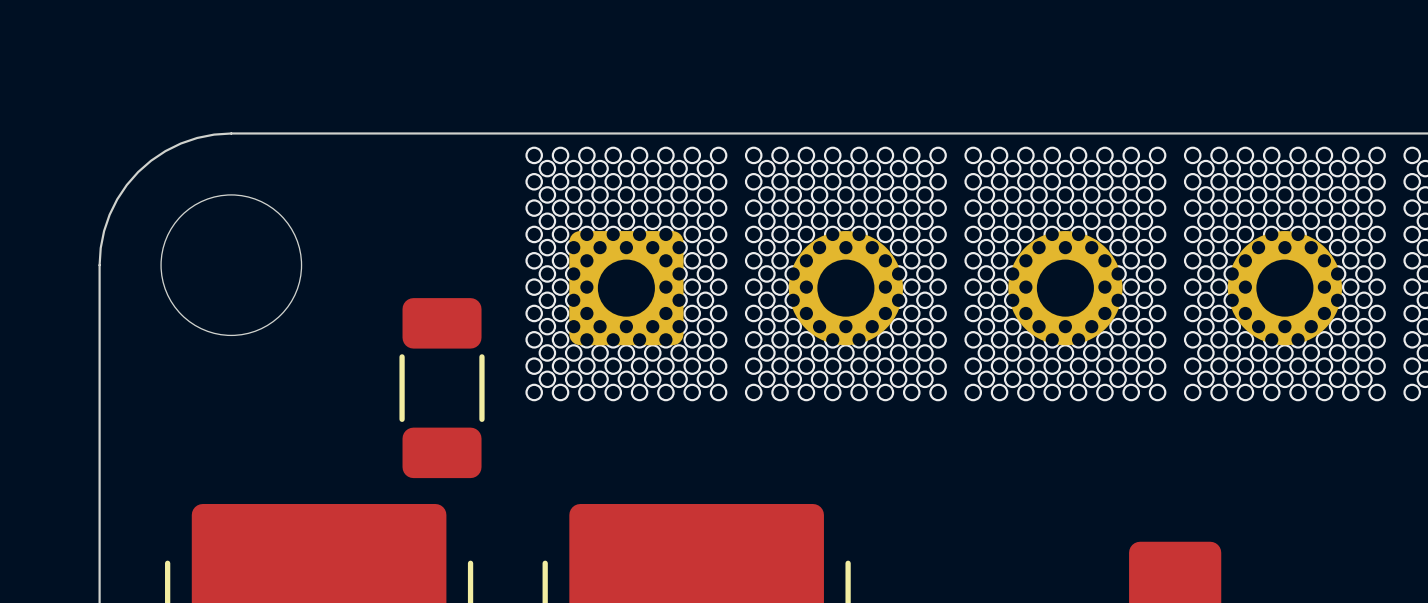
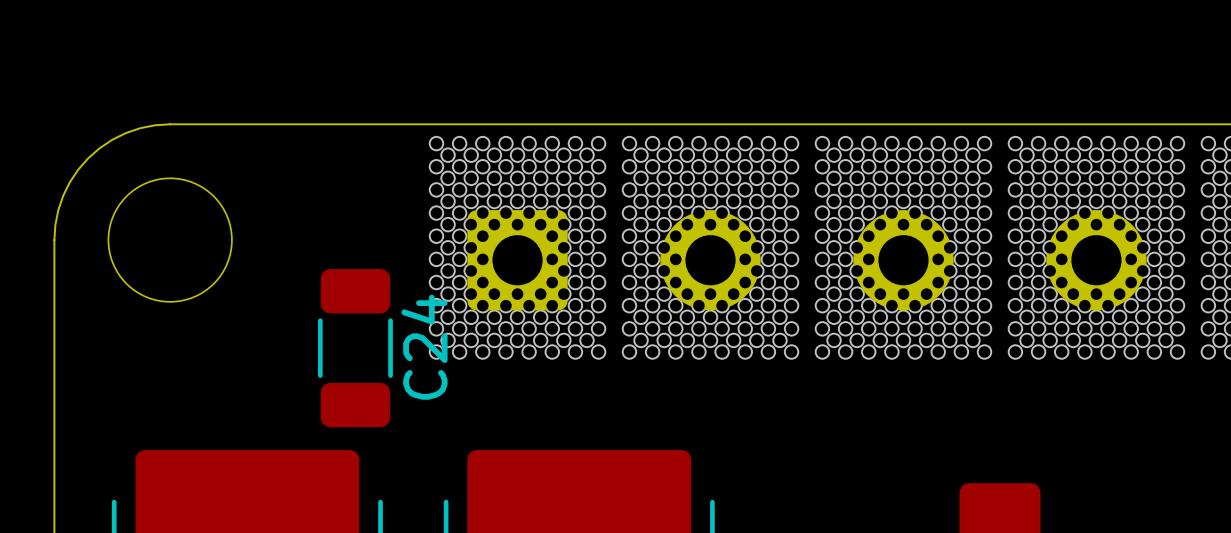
C24 name: none -> C24 (424, 347)

